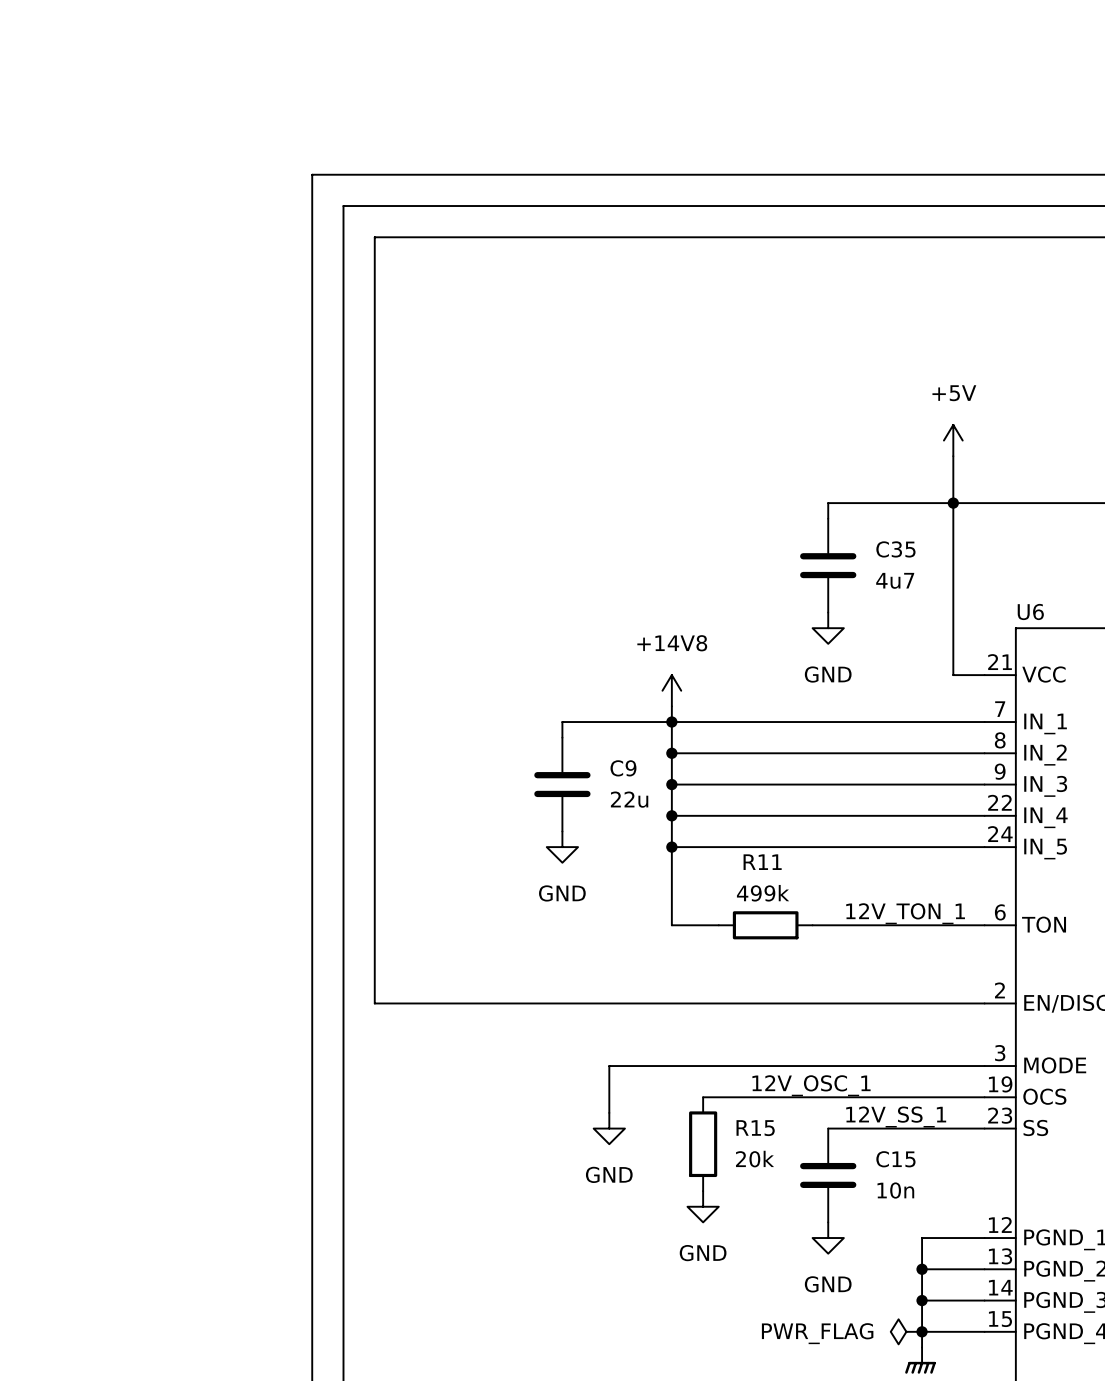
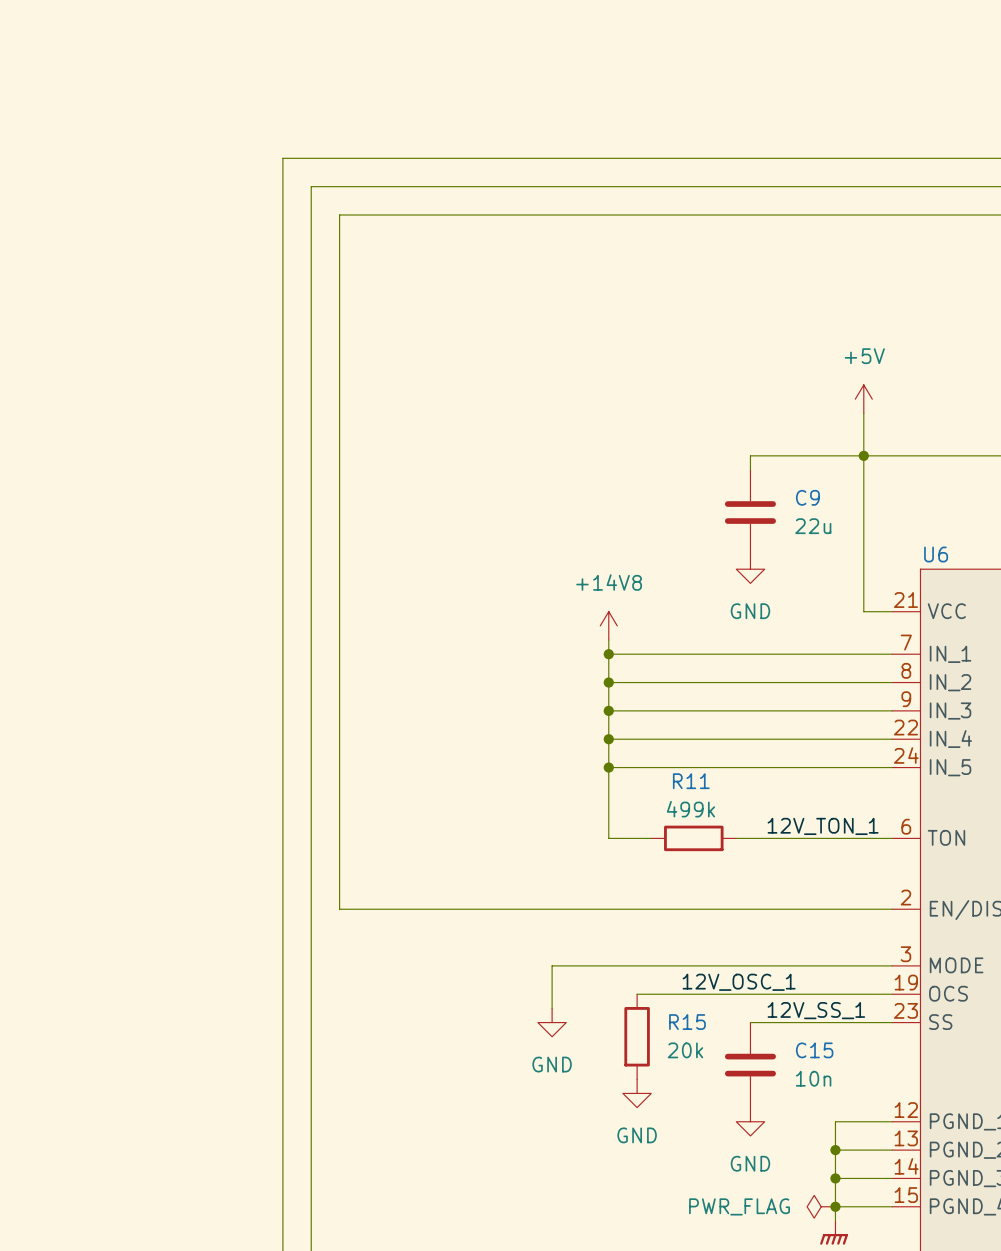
C35 name: C35 (895, 549) -> C9 (807, 497)
C35 value: 4u7 (895, 580) -> 22u (813, 526)
wire: (671, 722) (562, 722) (562, 737) -> none
C9: 22u (562, 784) -> none
power symbol: GND (562, 847) -> none

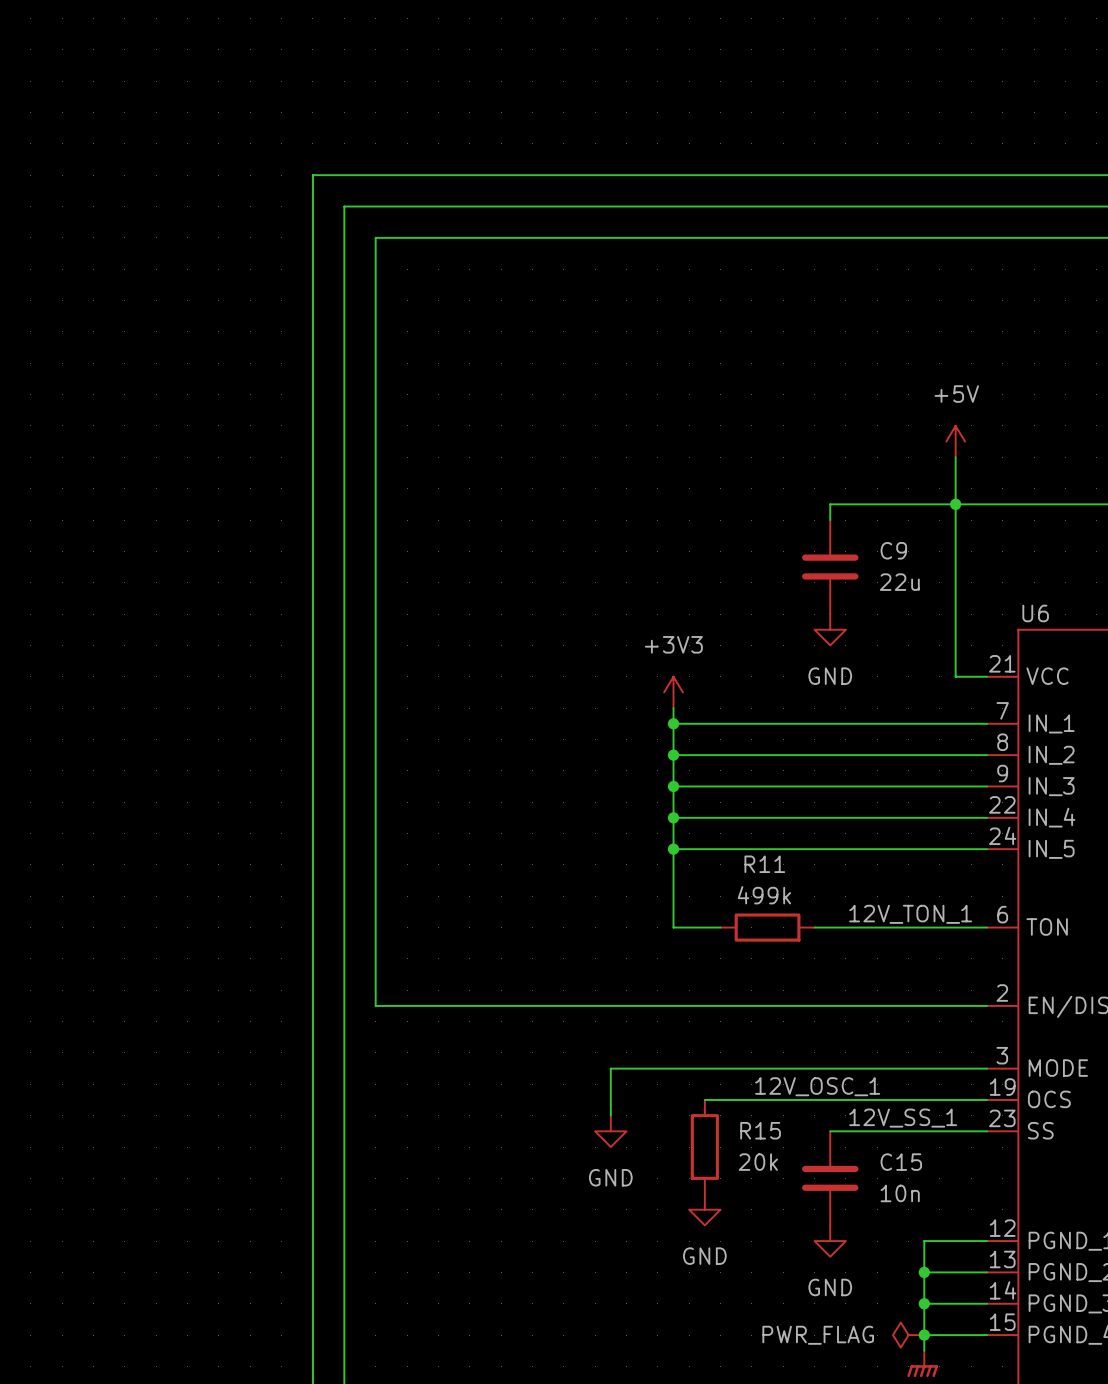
power symbol: +14V8 (608, 625) -> +3V3 (673, 692)

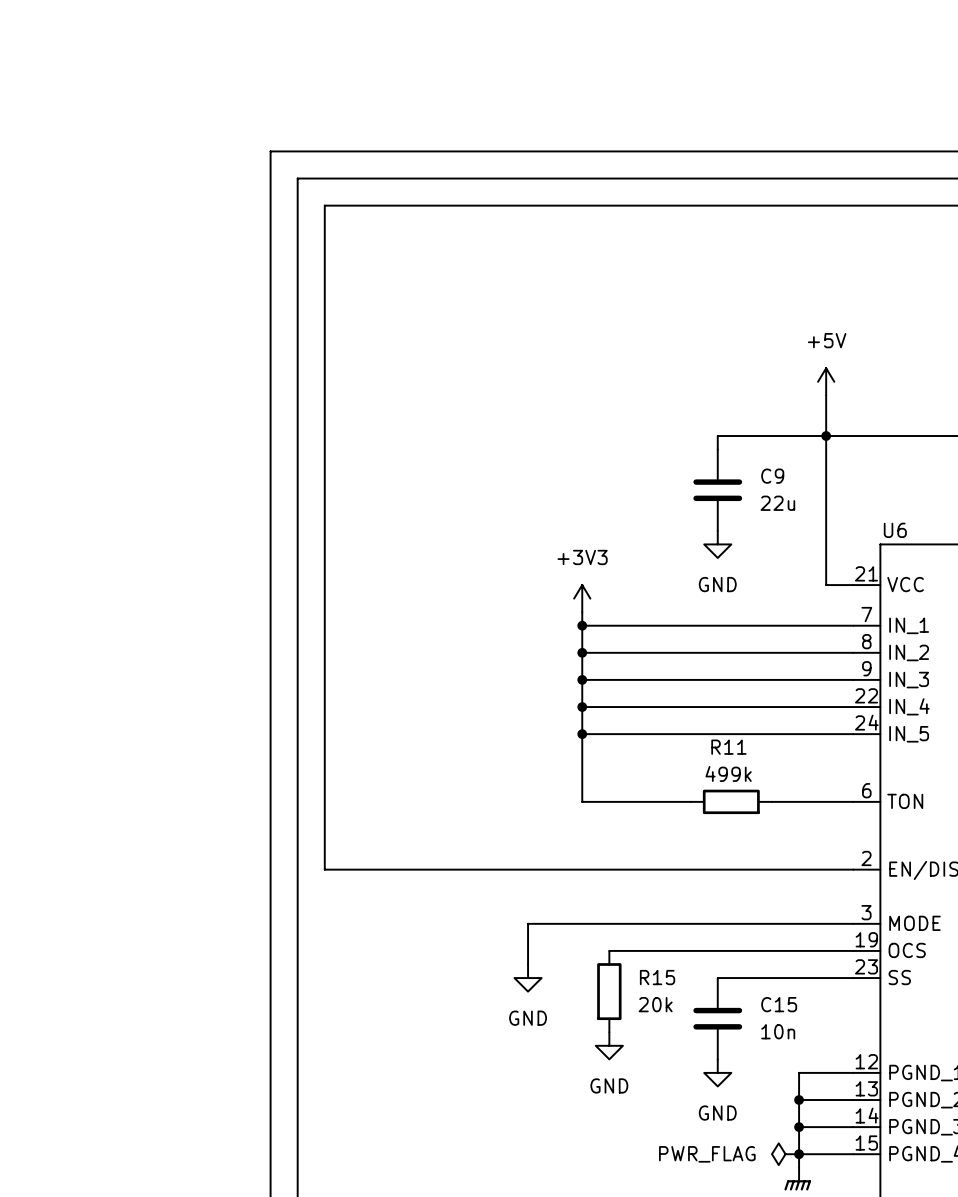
label: 12V_TON_1 (910, 914) -> none
R11 position: (767, 927) -> (731, 801)
wire: (814, 927) (892, 927) -> (622, 801) (690, 801)
label: 12V_OSC_1 (817, 1086) -> none
label: 12V_SS_1 (903, 1118) -> none

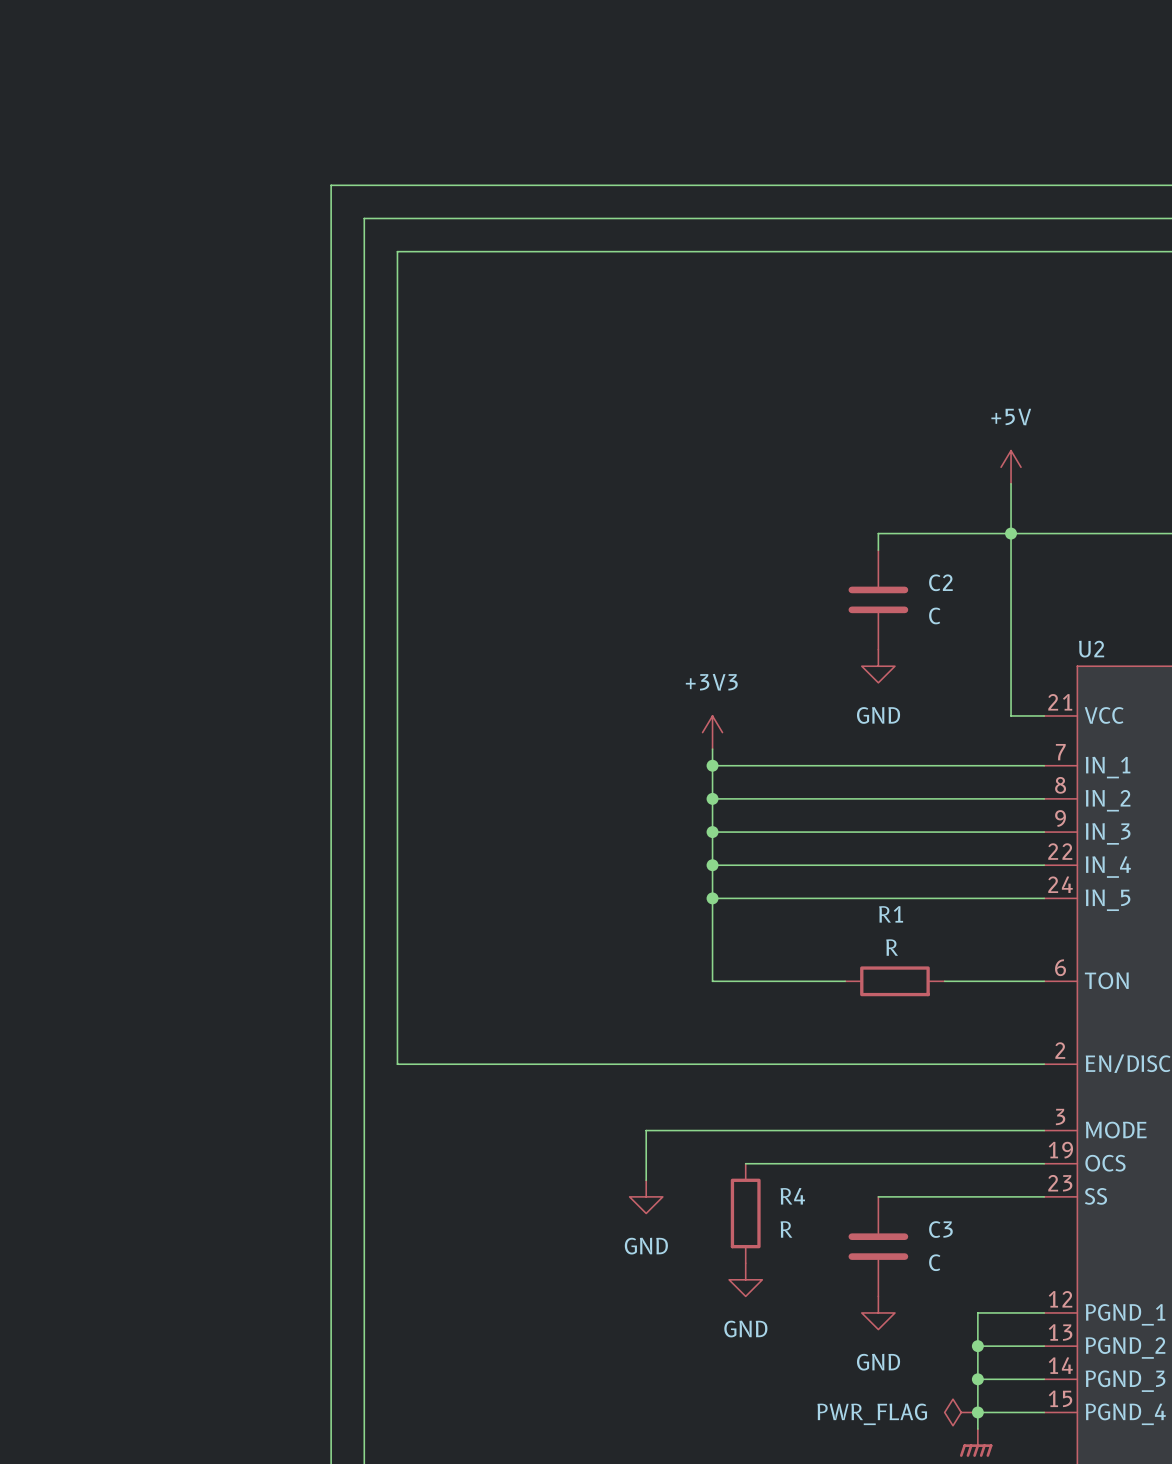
C9 name: C9 (772, 476) -> C2 (940, 582)
C9 value: 22u (777, 503) -> C (934, 615)
U6 name: U6 (895, 530) -> U2 (1091, 649)
R11 name: R11 (728, 747) -> R1 (891, 914)
R11 value: 499k (728, 773) -> R (892, 947)
R15 name: R15 (657, 977) -> R4 (792, 1196)
R15 value: 20k (655, 1004) -> R (786, 1229)
C15 name: C15 (779, 1004) -> C3 (940, 1229)
C15 value: 10n (778, 1031) -> C (934, 1262)

